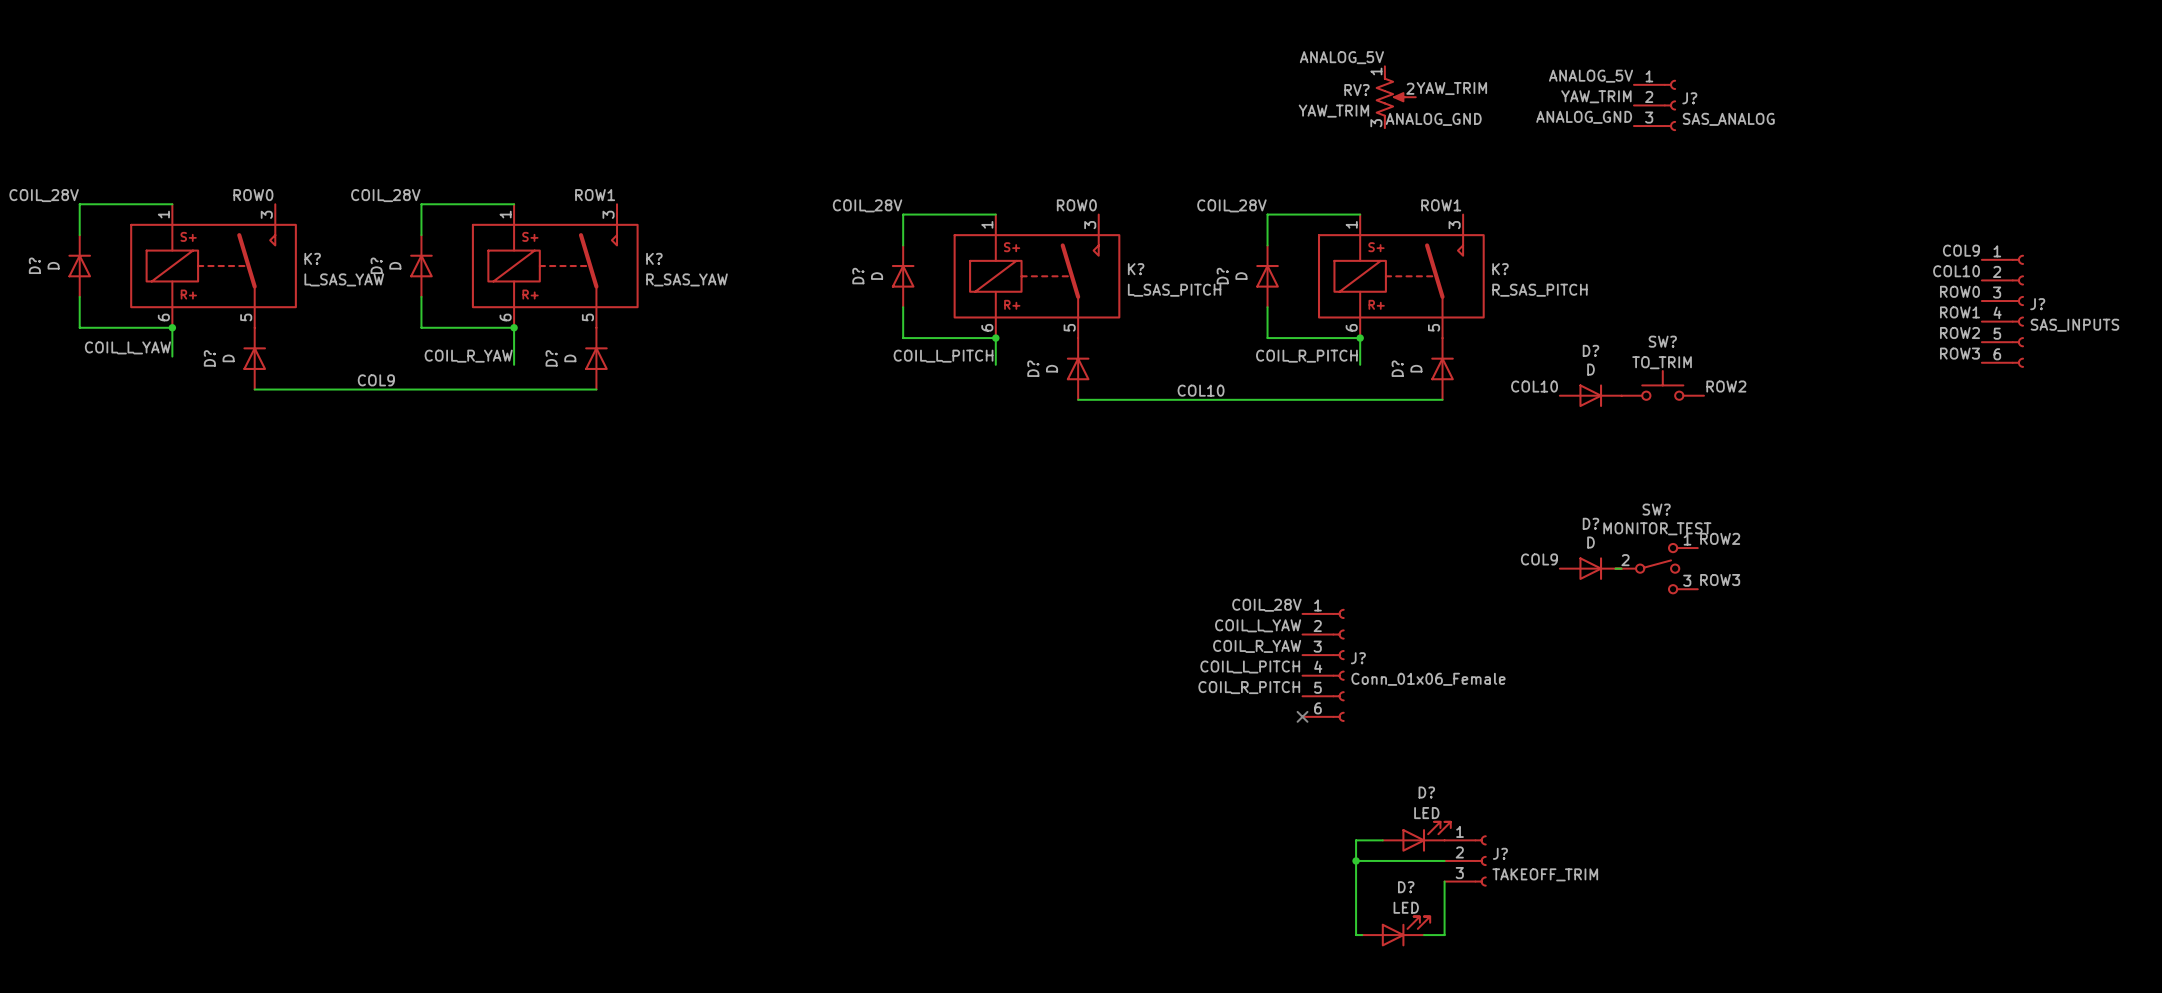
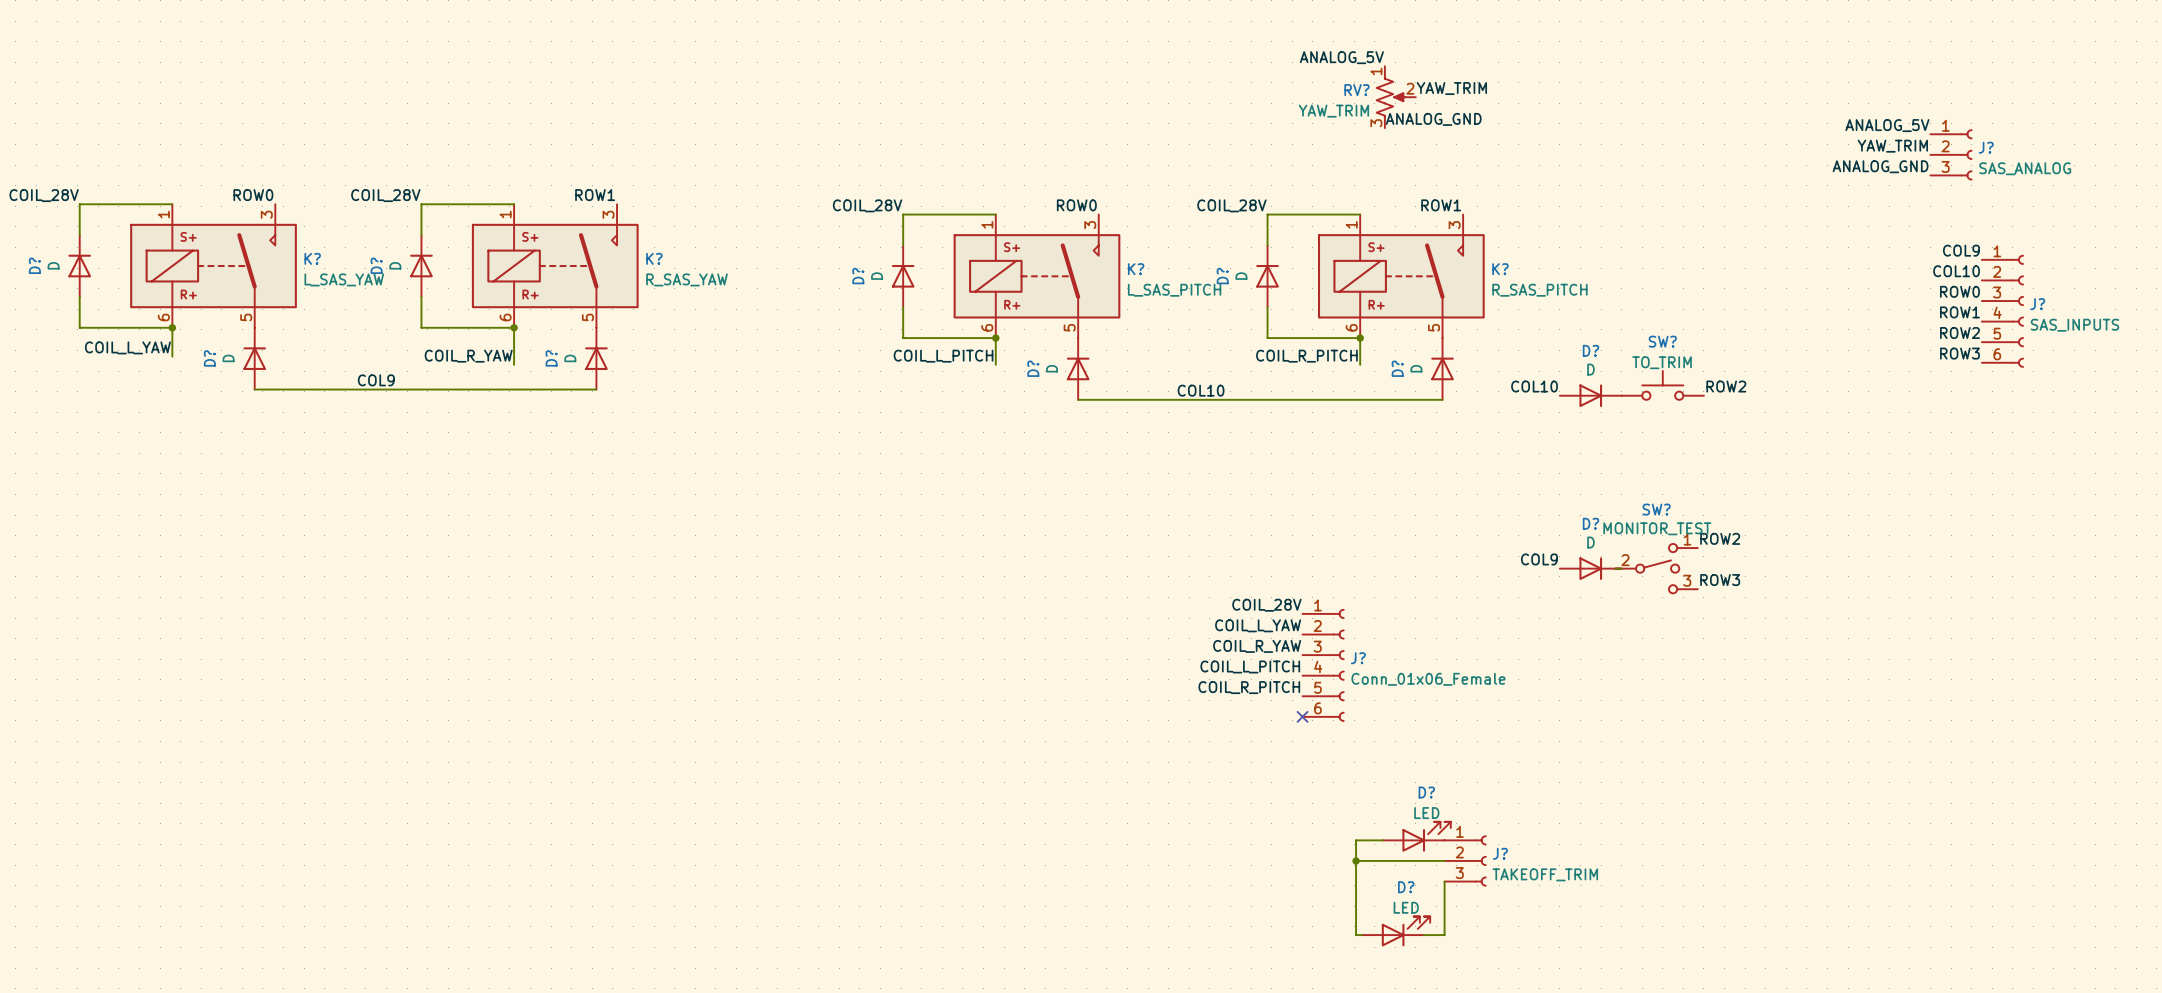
label: ANALOG_5V (1591, 76) -> none
label: YAW_TRIM (1596, 96) -> none
J?: SAS_ANALOG (1654, 105) -> none
label: ANALOG_GND (1584, 117) -> none
label: none -> ANALOG_5V (1887, 125)
label: none -> YAW_TRIM (1892, 146)
J?: none -> SAS_ANALOG (1951, 154)
label: none -> ANALOG_GND (1880, 166)

